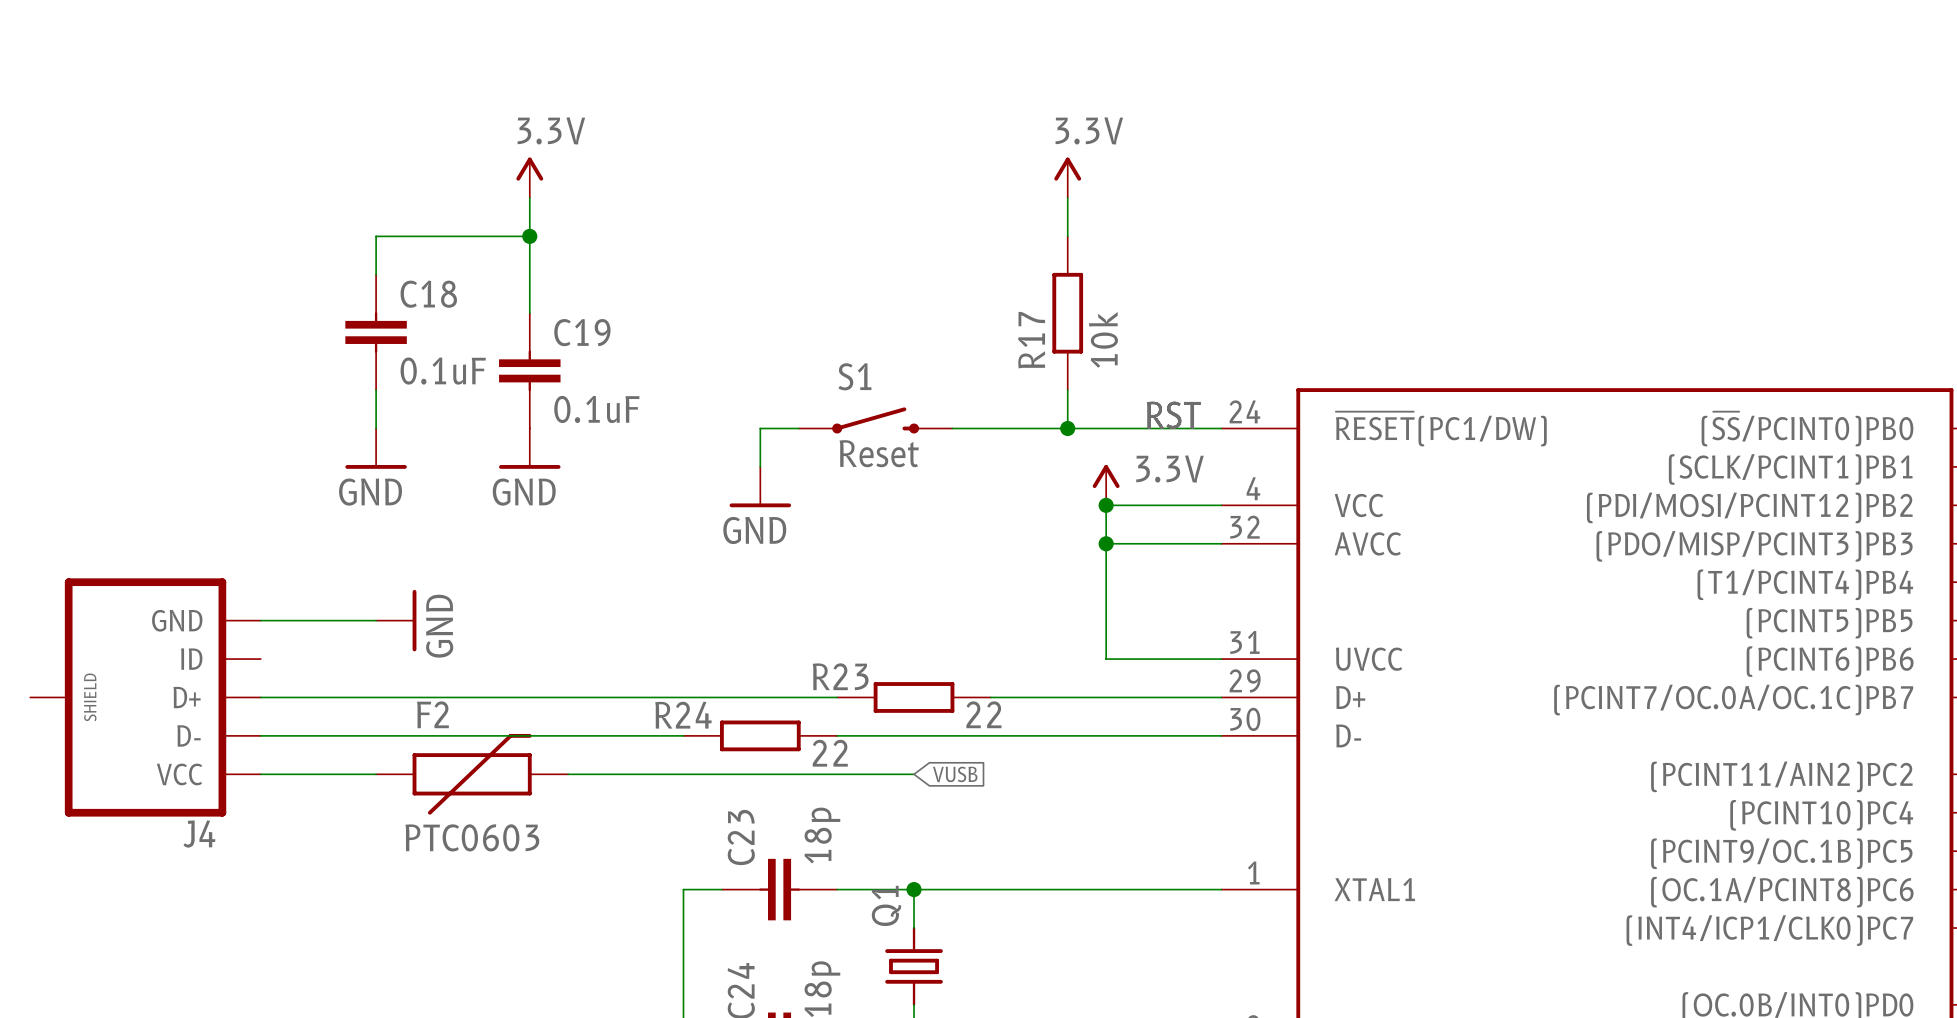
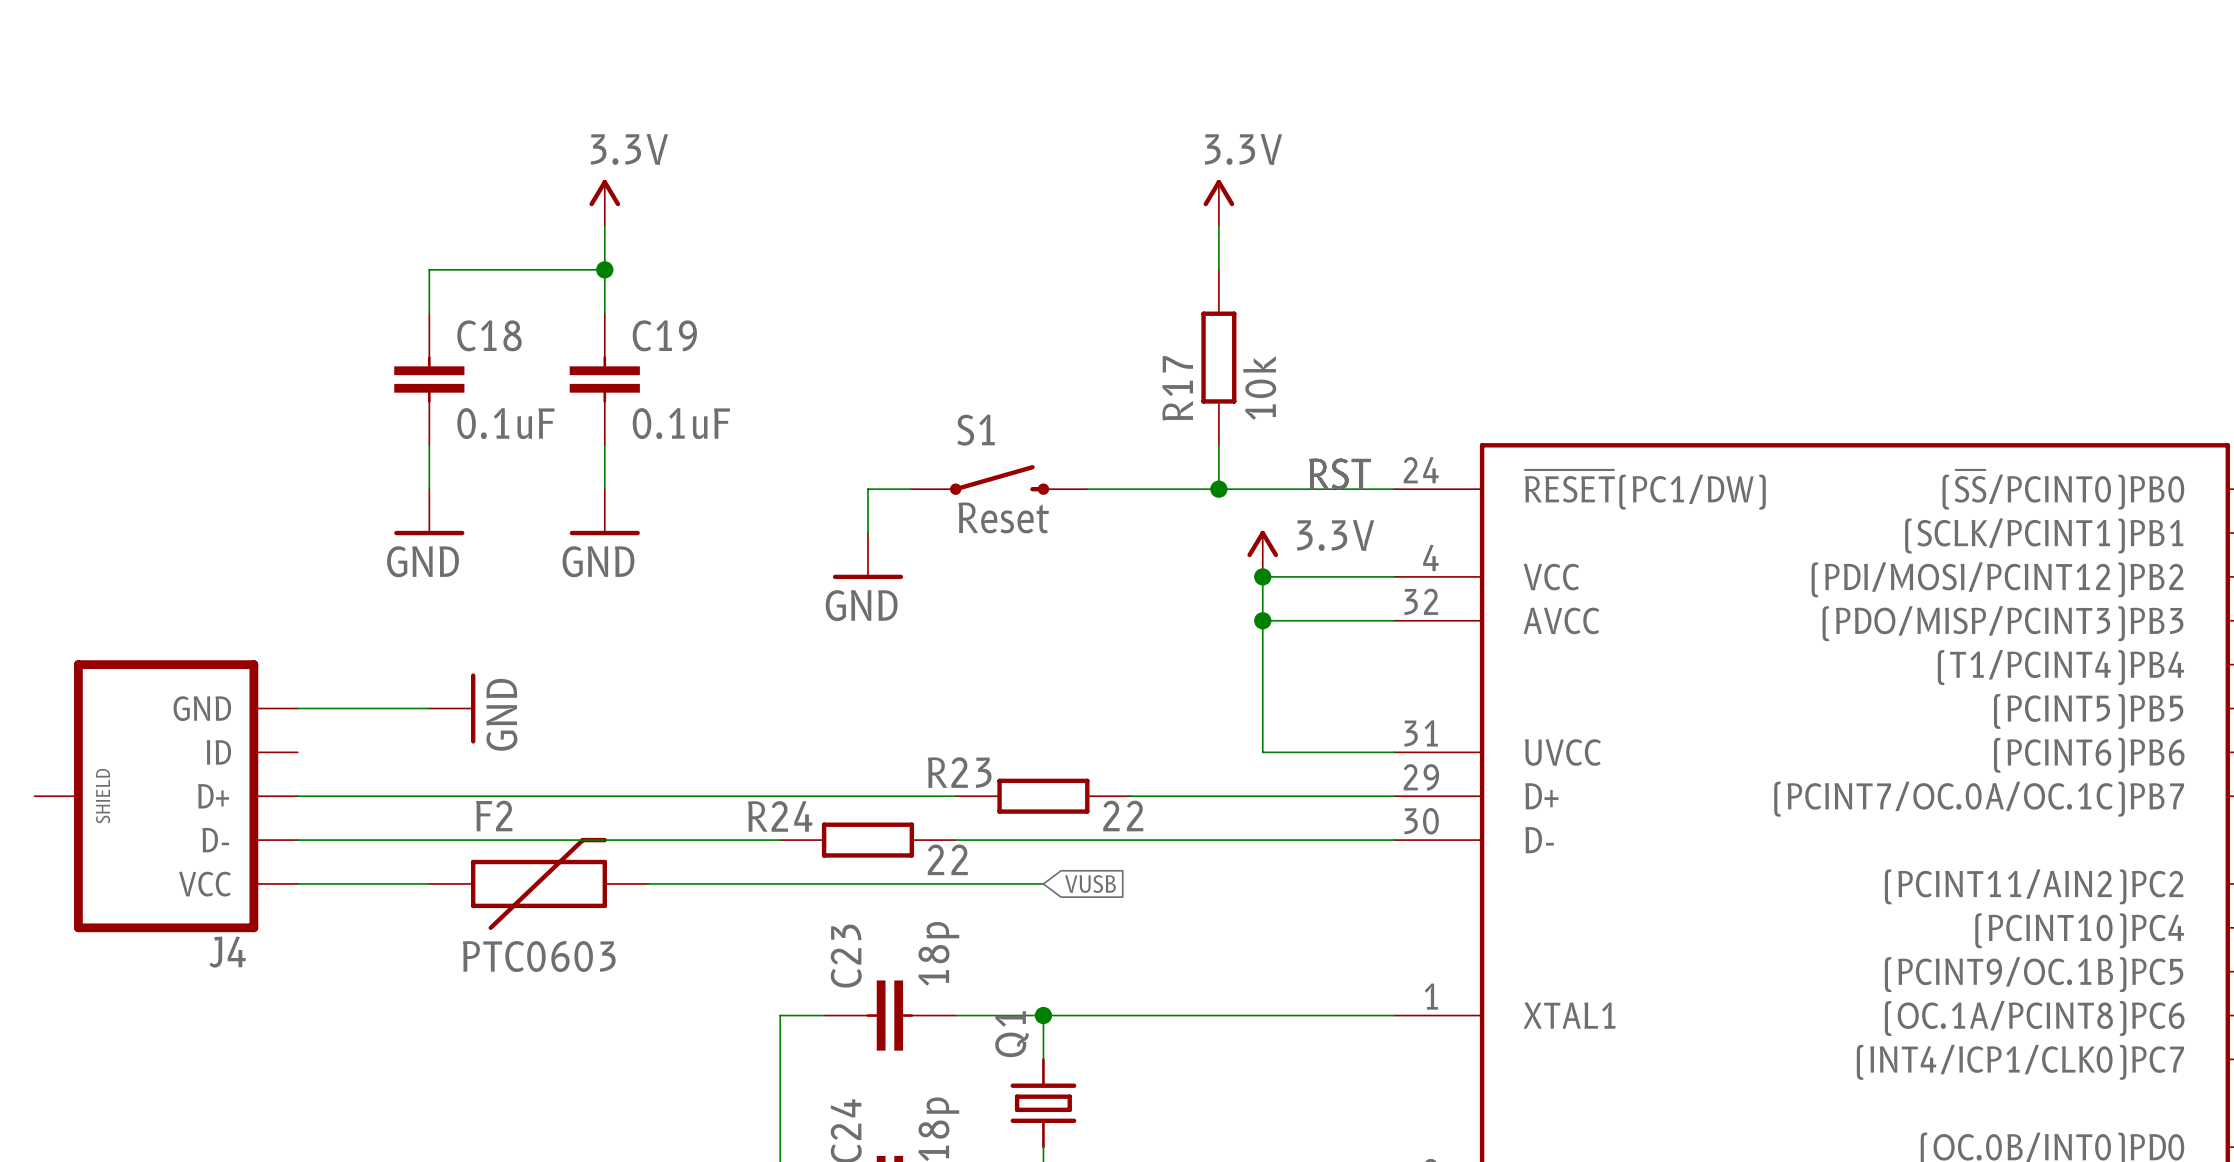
C19 position: (529, 370) -> (604, 379)

